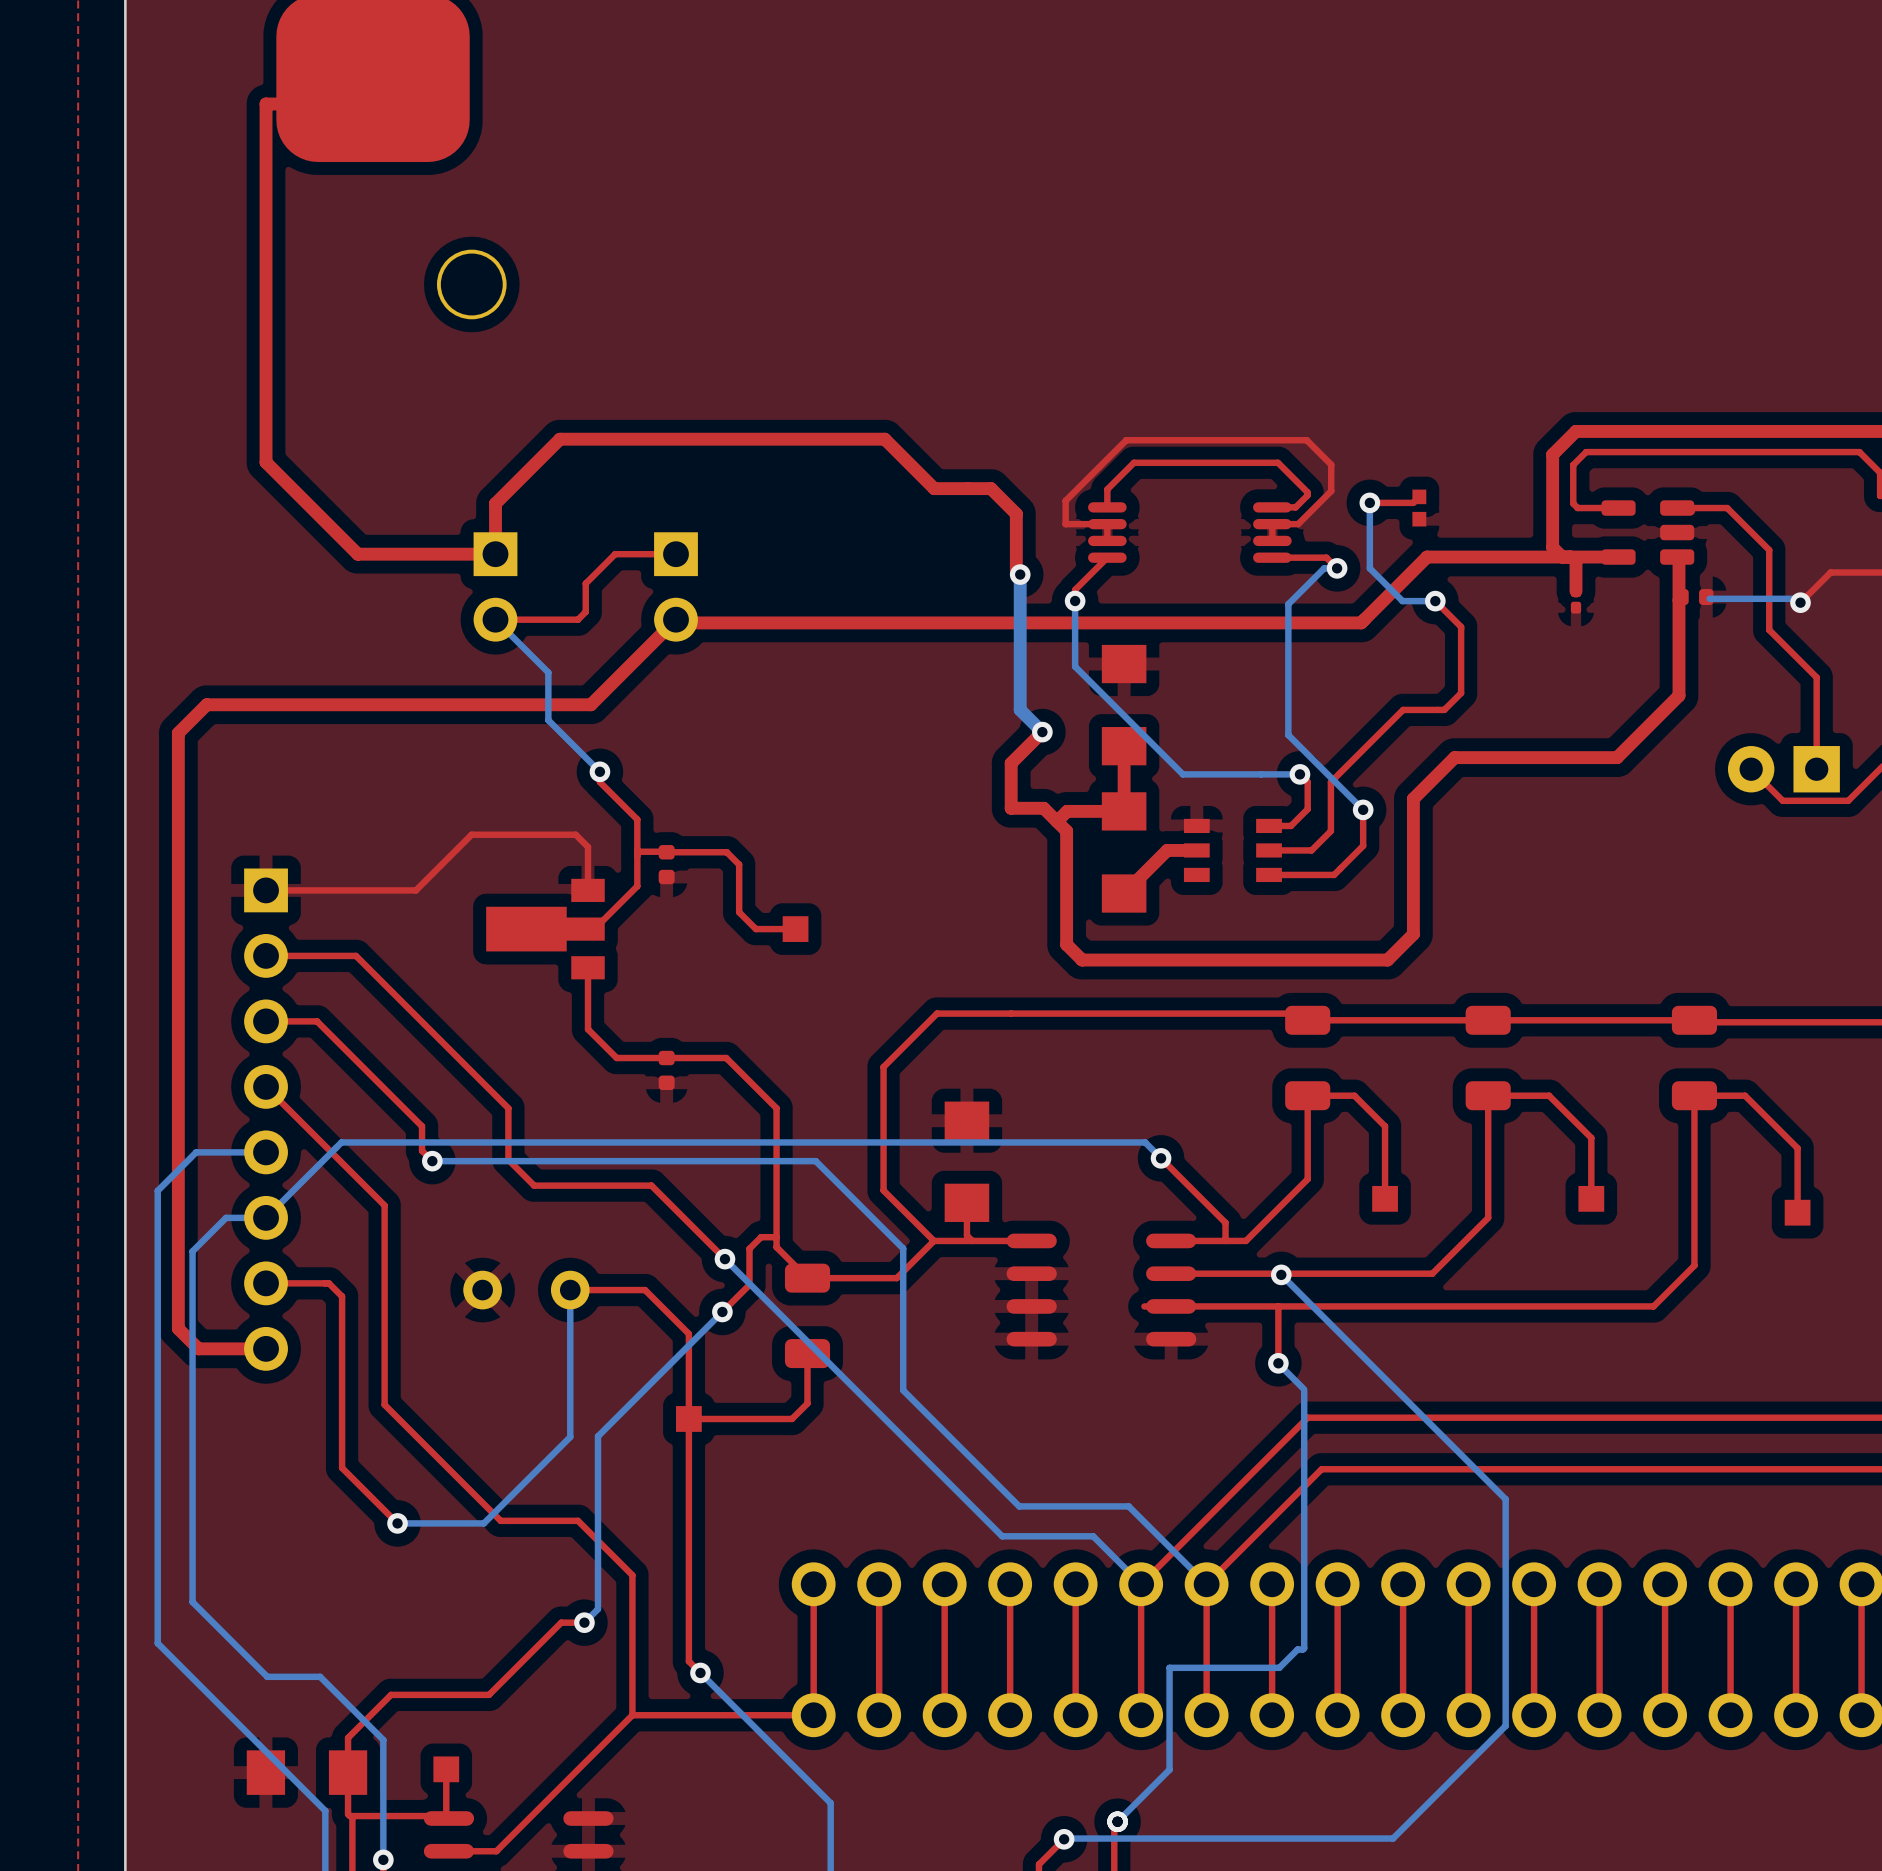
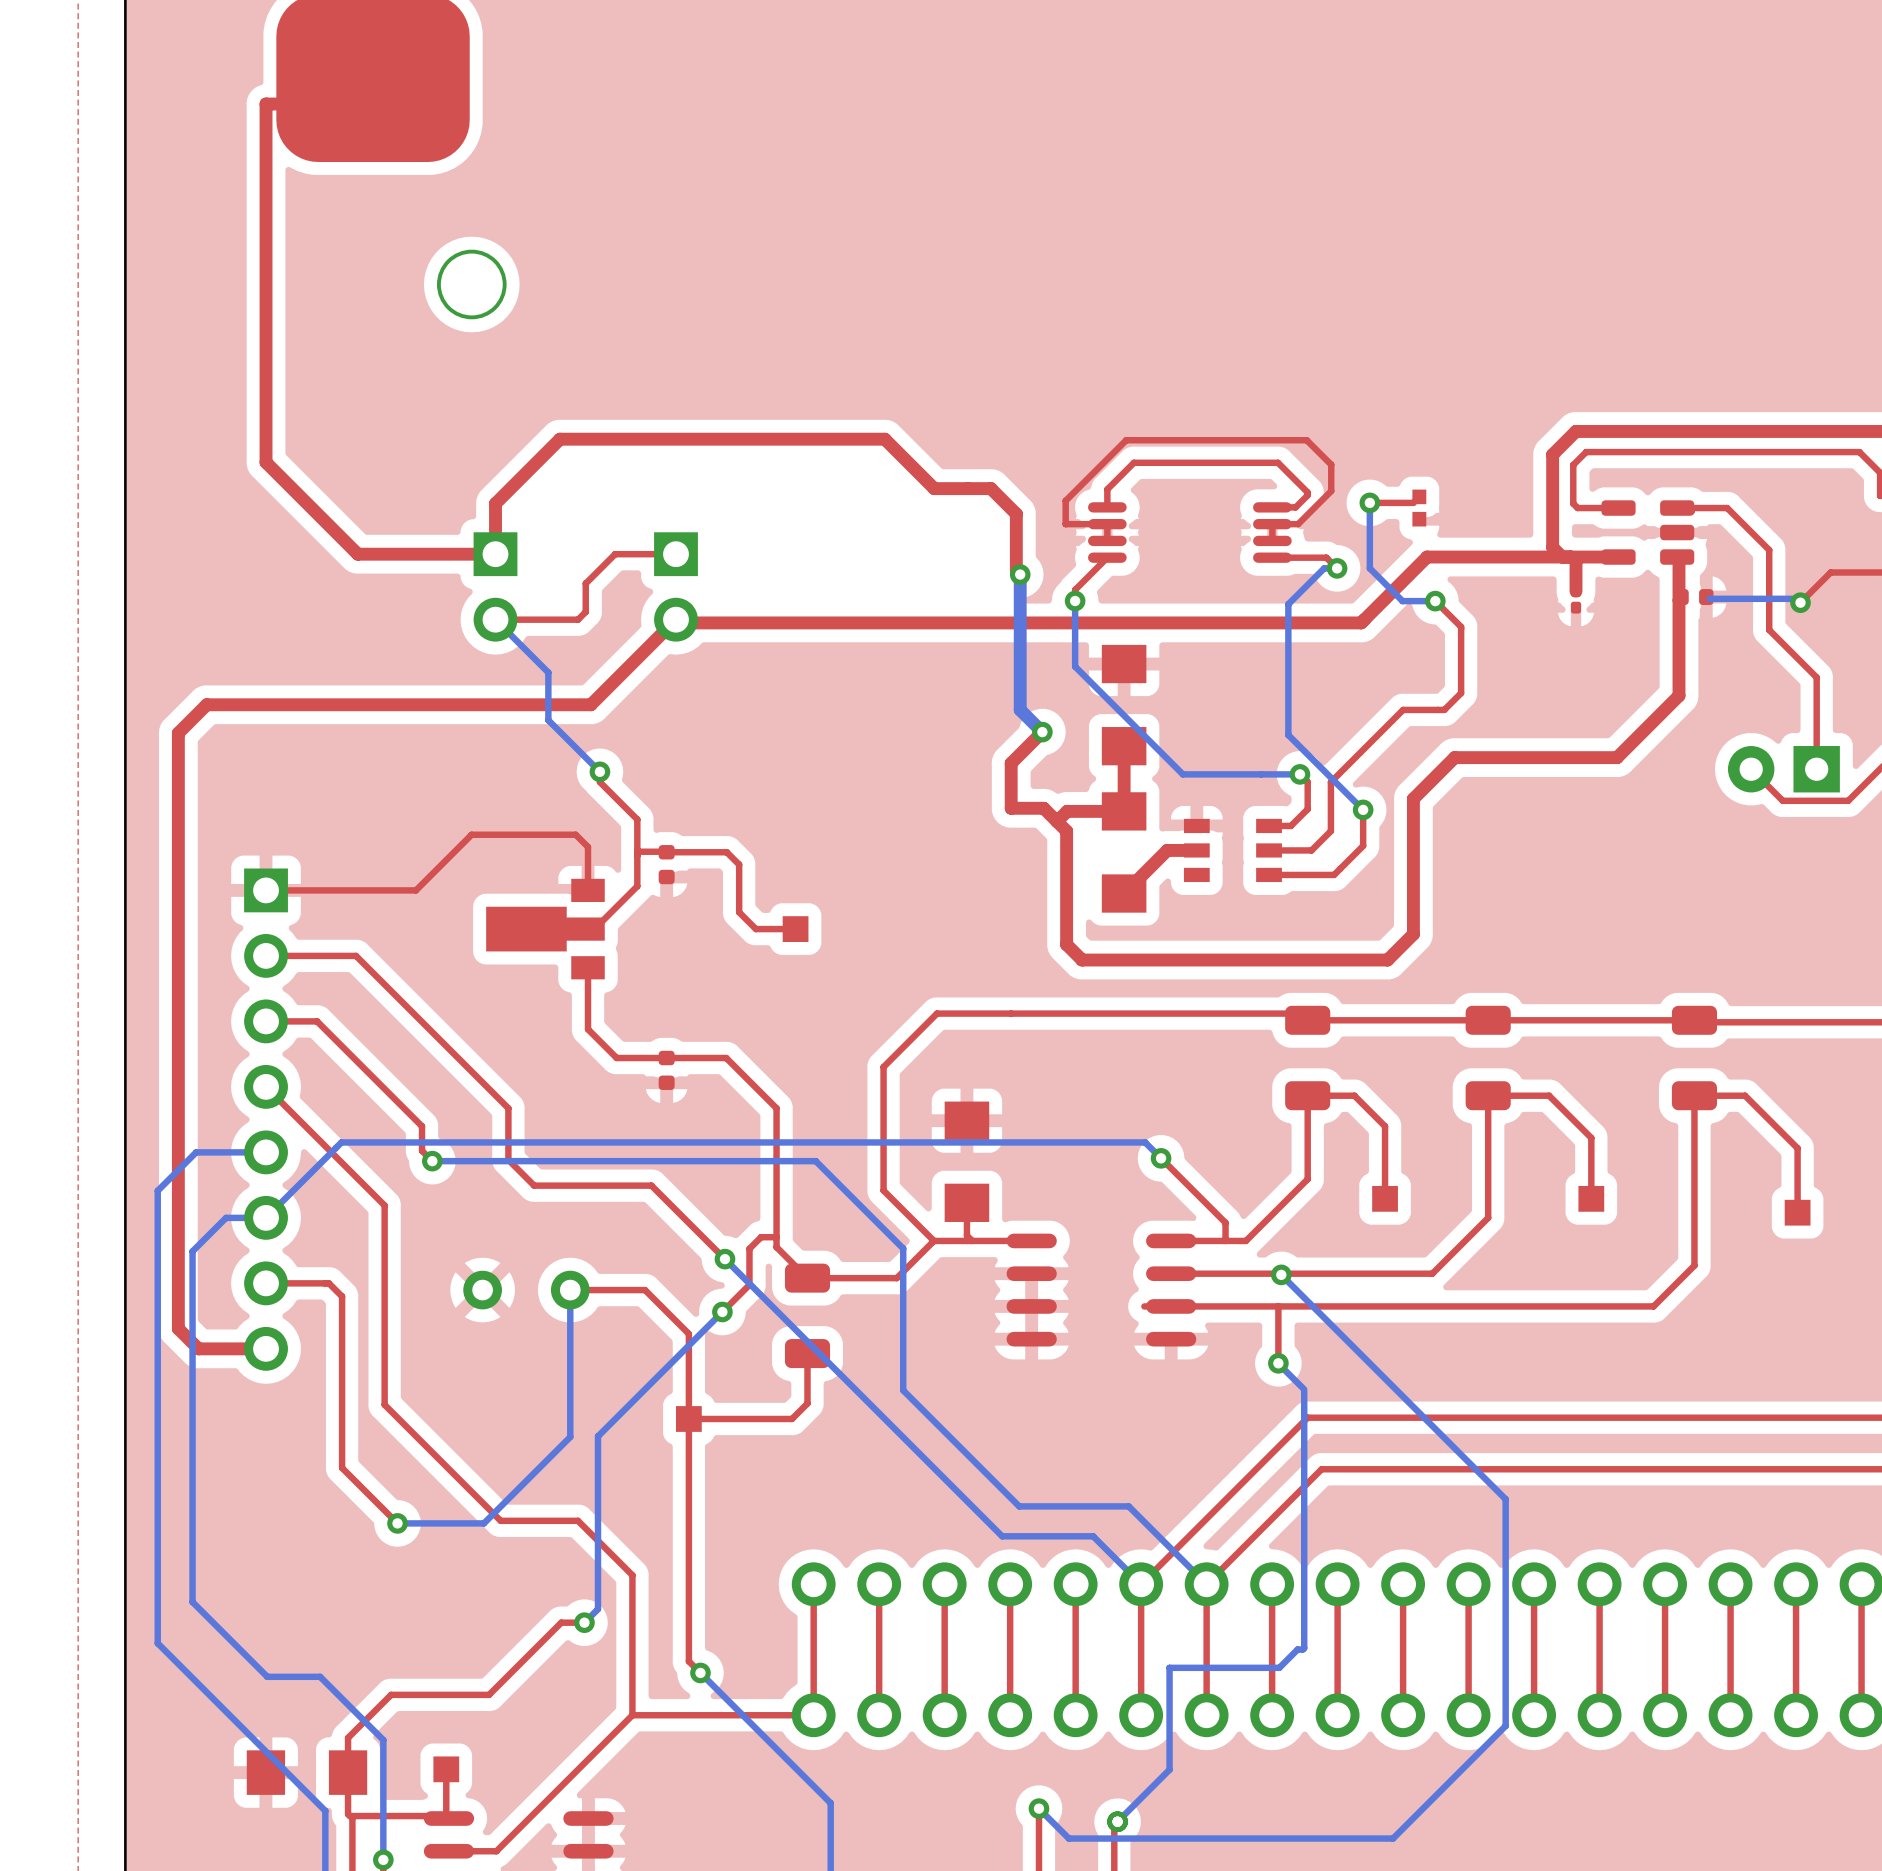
bottom track: none -> (1038, 1808) (1068, 1838)
top track: (1064, 1839) (1038, 1864) -> (1038, 1808) (1038, 1864)
via position: (1064, 1839) -> (1038, 1808)

